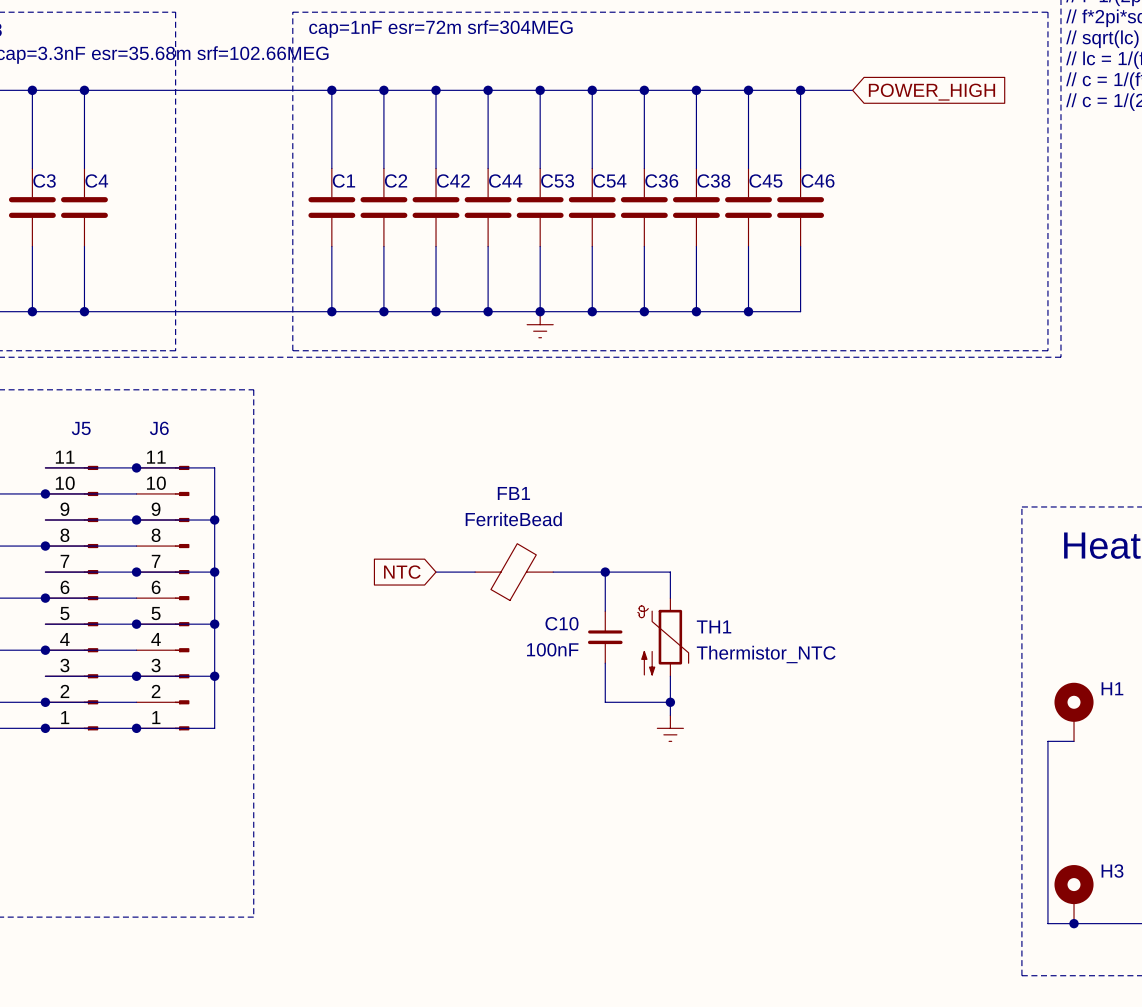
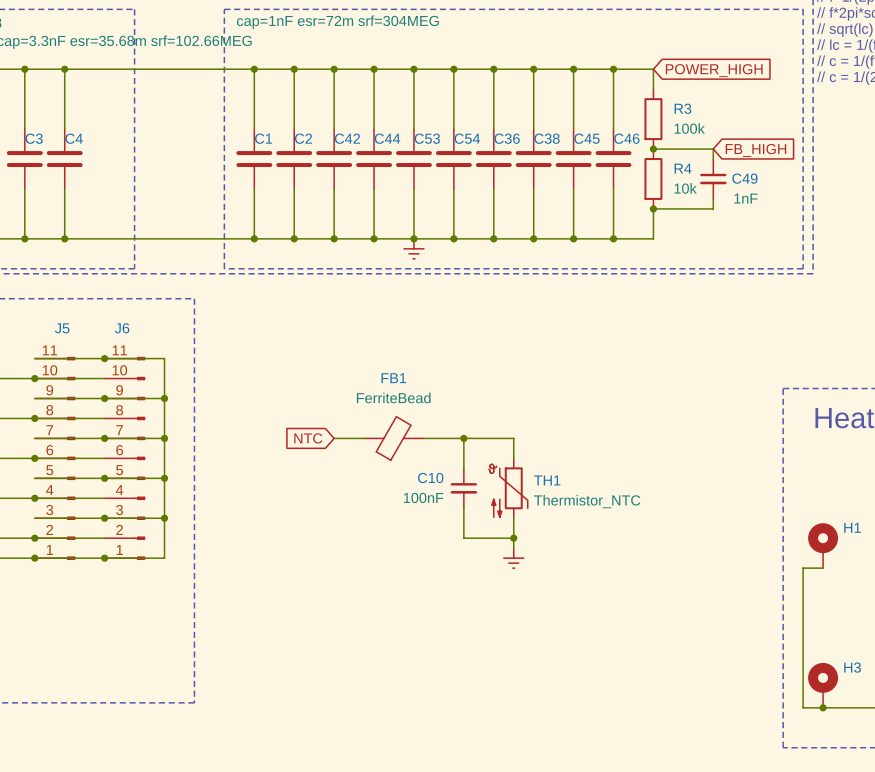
wire: none -> (653, 69) (653, 89)
R3: none -> 100k (653, 119)
wire: none -> (653, 149) (713, 149) (713, 159)
junction: none -> (653, 149)
global label: none -> FB_HIGH (755, 150)
R4: none -> 10k (653, 178)
C49: none -> 1nF (713, 178)
wire: none -> (713, 198) (713, 208) (653, 208) (653, 238) (613, 238)
junction: none -> (653, 208)
junction: none -> (613, 238)

